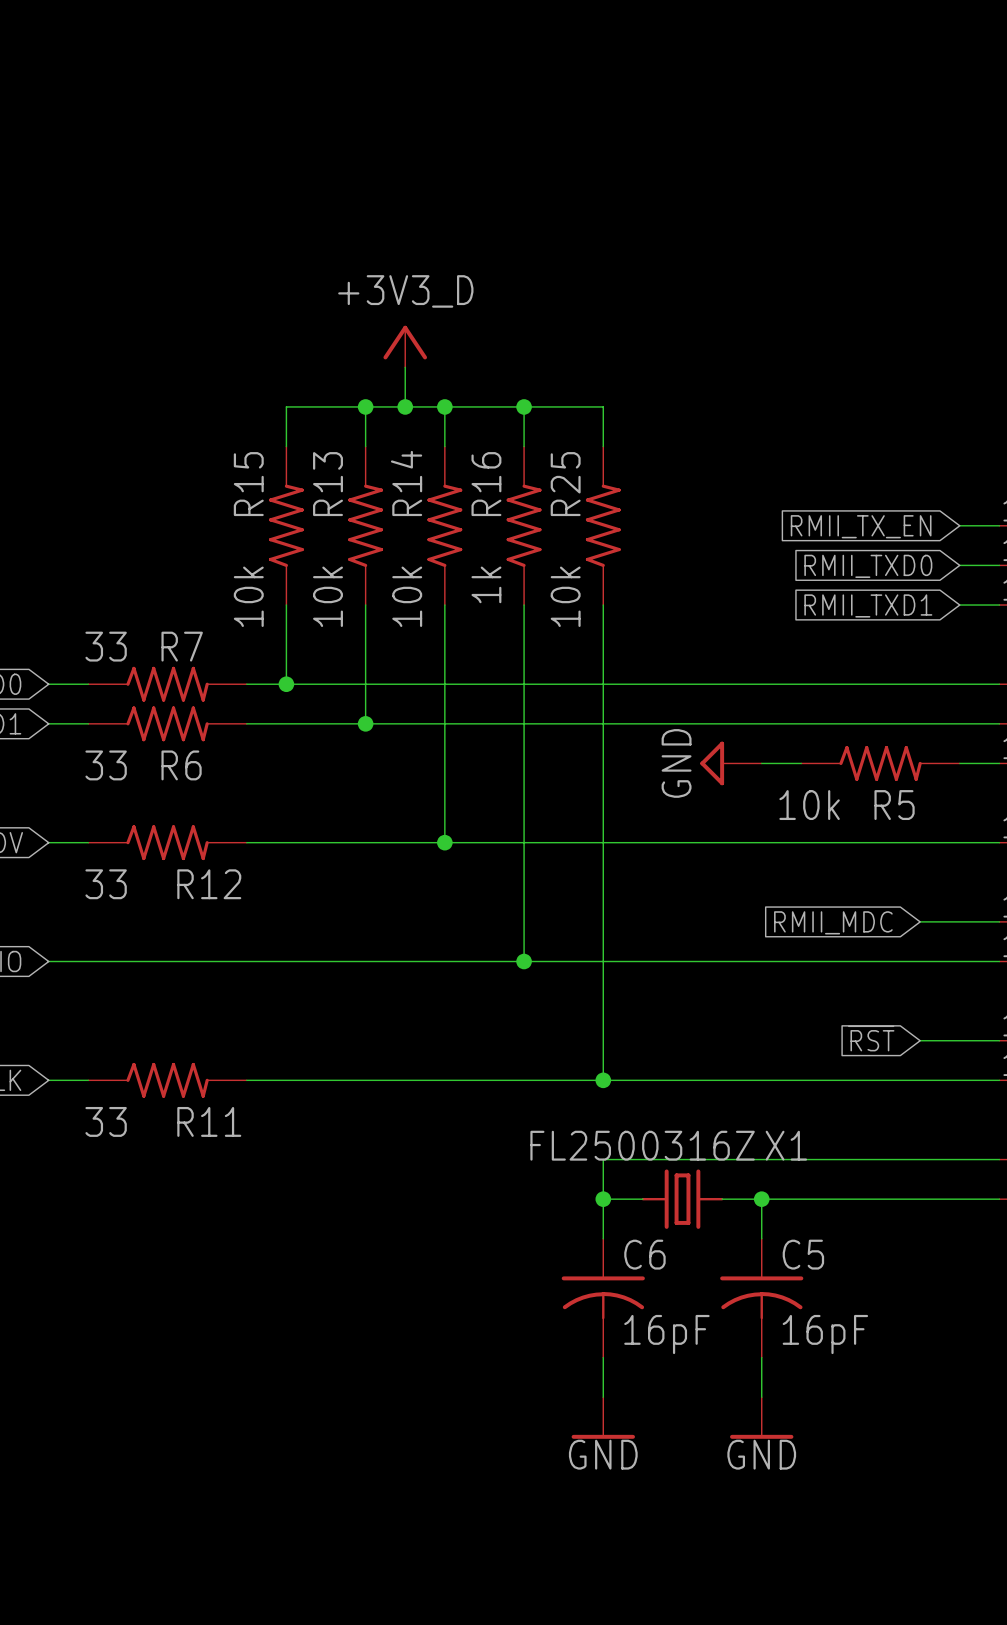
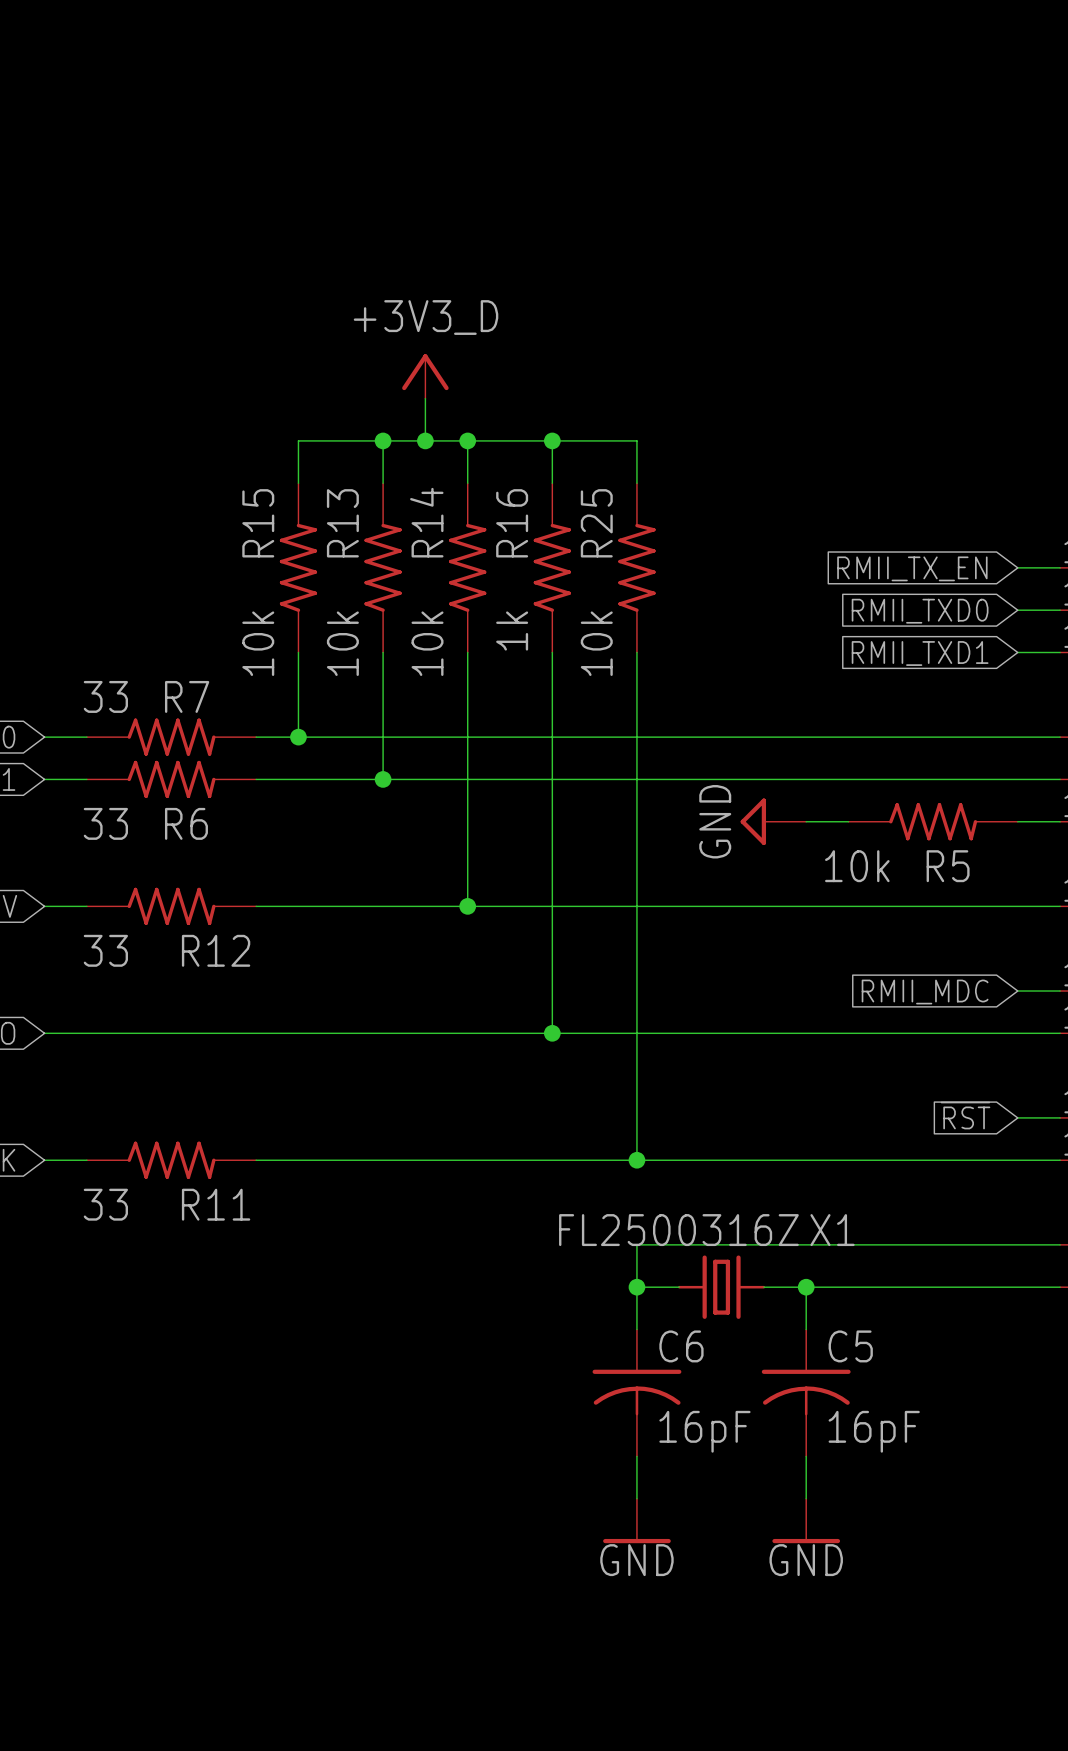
wire: (920, 921) (959, 921) -> none
global label position: RMII_MDC (833, 922) -> RMII_MDC (925, 992)
global label position: ~{RST} (871, 1038) -> ~{RST} (965, 1115)
wire: (920, 1040) (959, 1040) -> none

